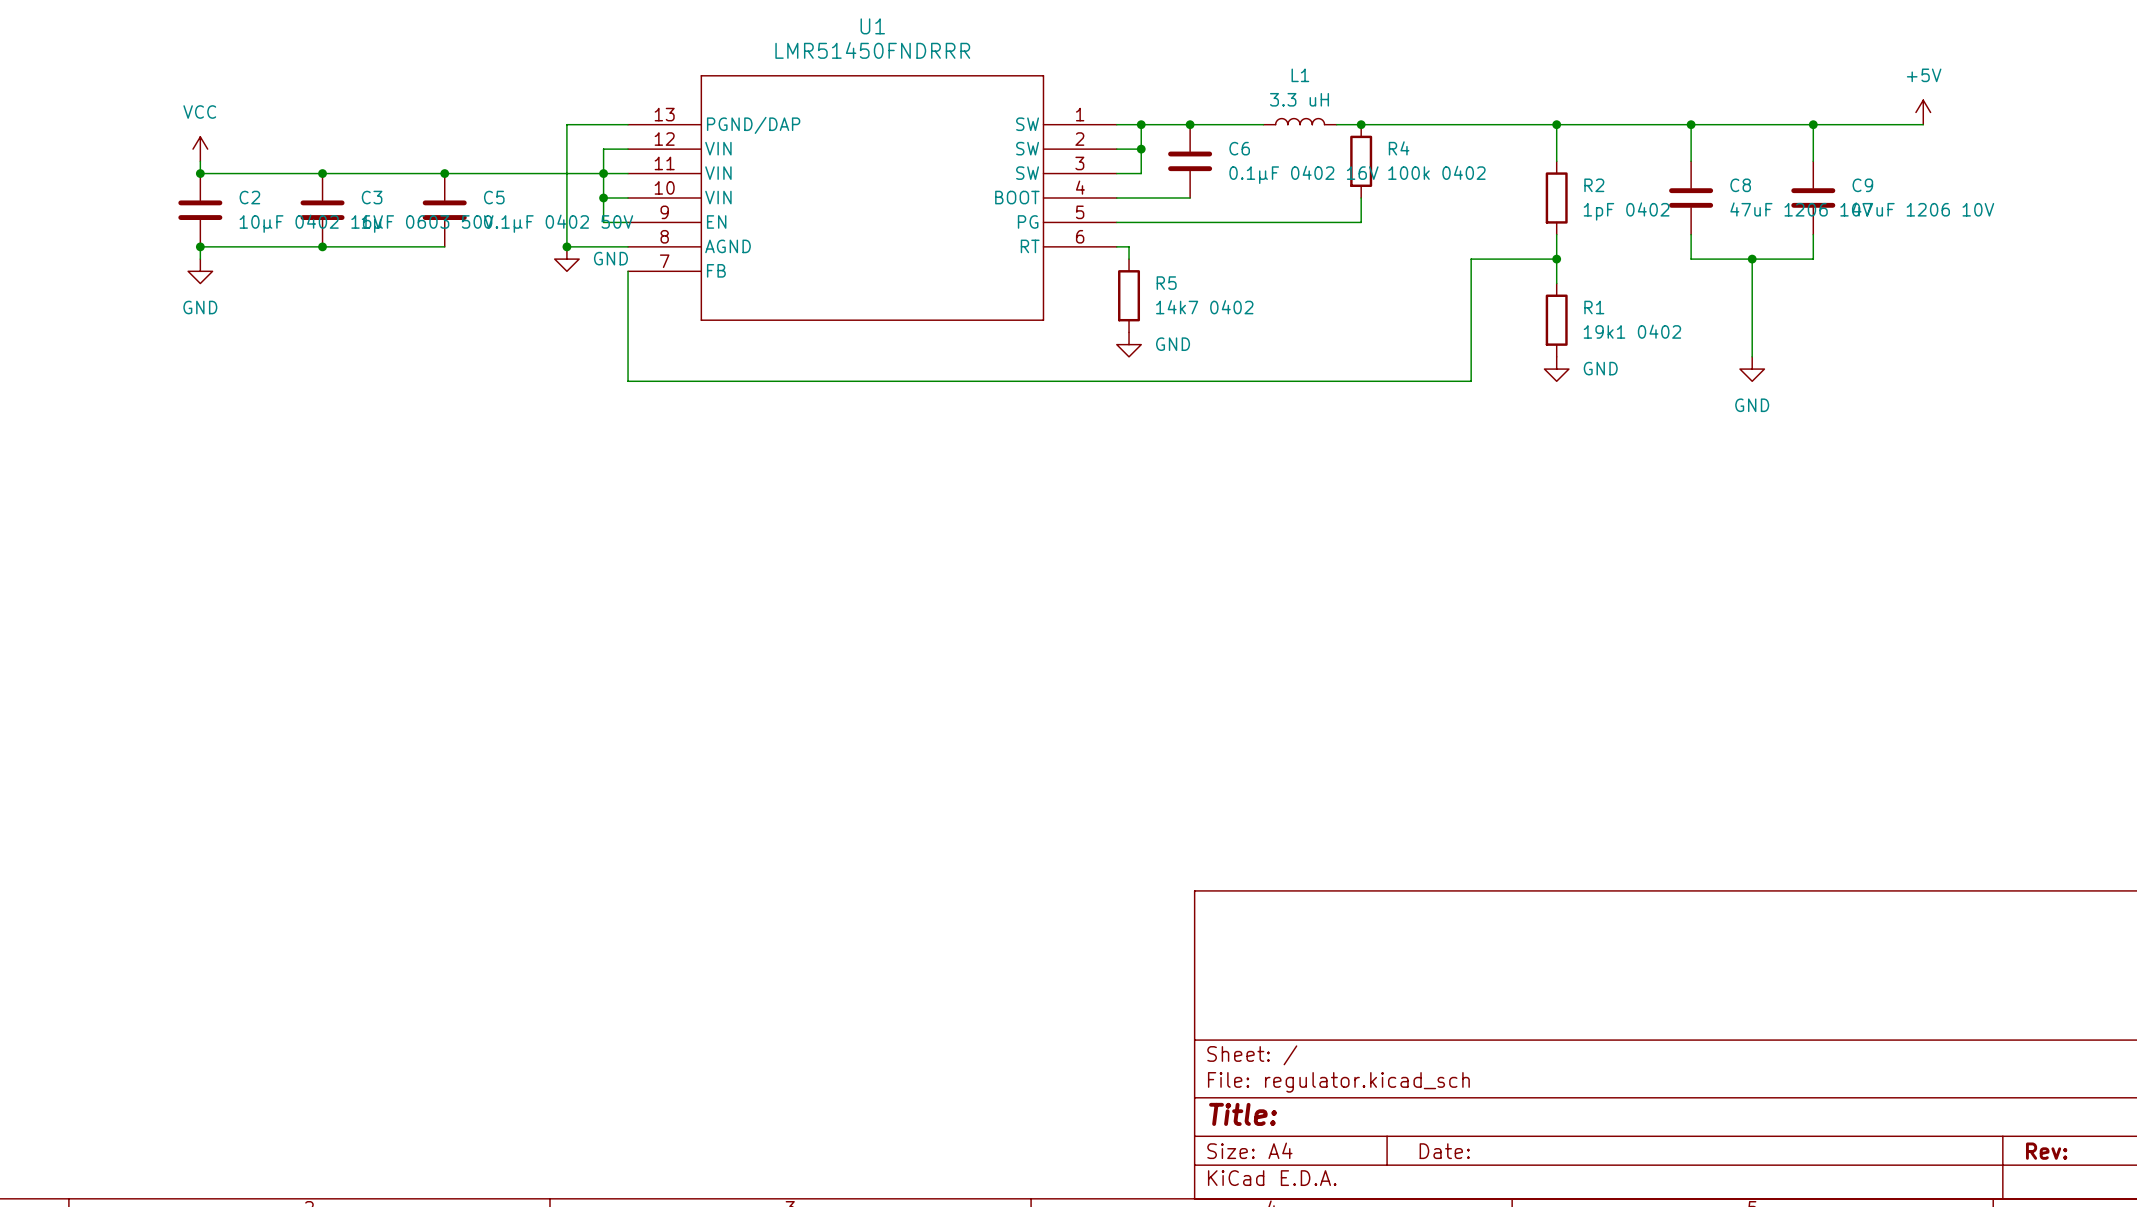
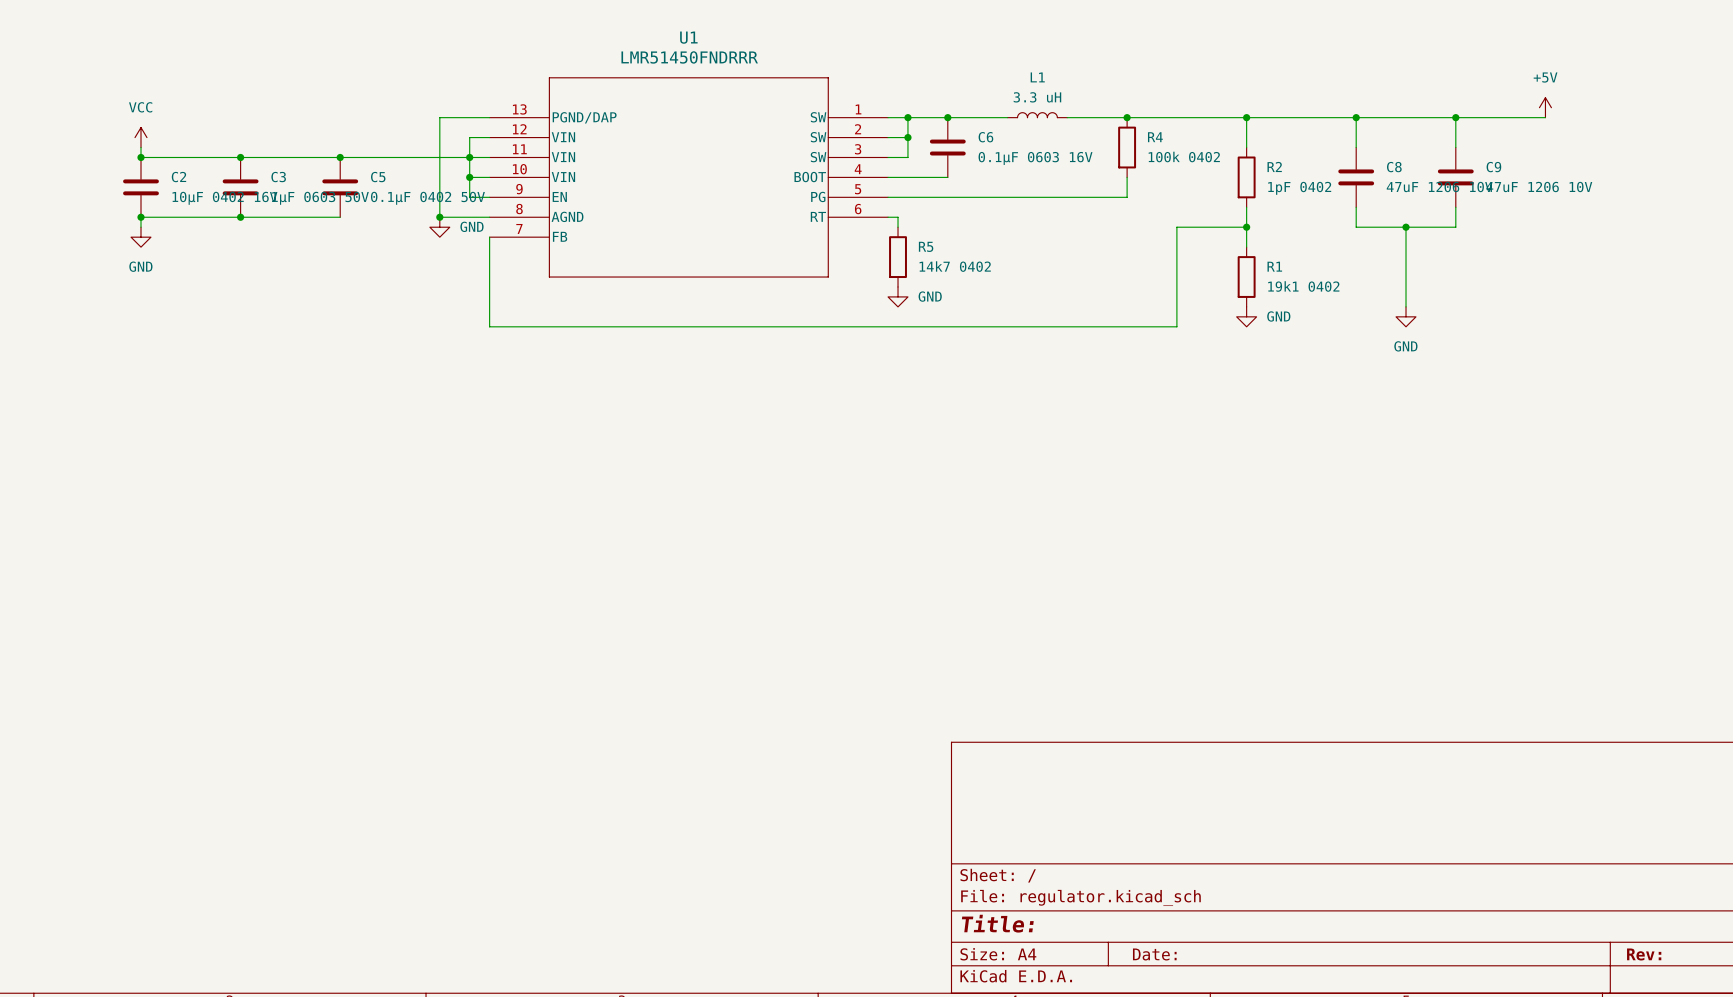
junction position: (1361, 124) -> (1127, 117)
R4 position: (1361, 161) -> (1127, 147)
C6 value: 0.1μF 0402 16V (1303, 174) -> 0.1μF 0603 16V (1035, 158)
wire: (1361, 197) (1361, 222) -> (1127, 177) (1127, 197) (1087, 197)

